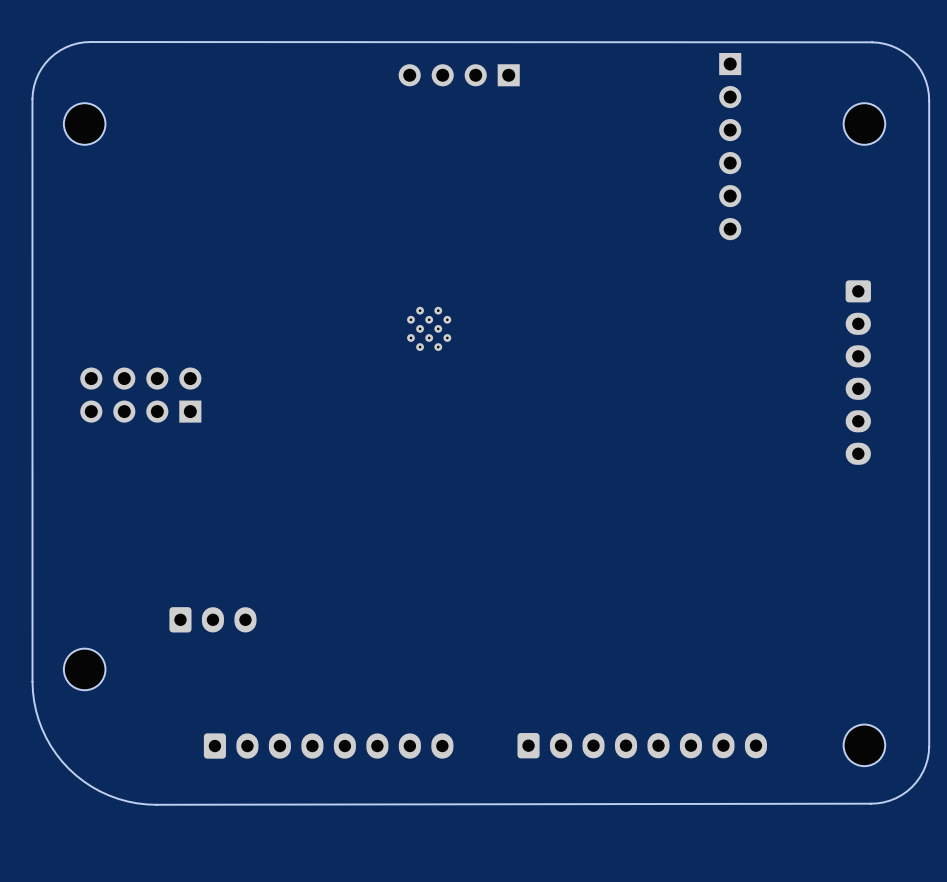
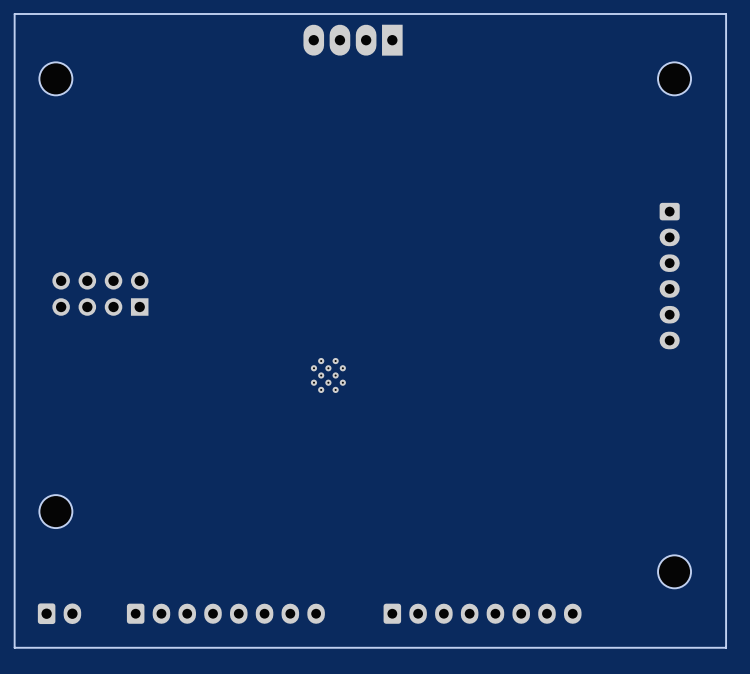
board edge: (90, 42) (872, 42) (891, 45) (908, 55) (923, 75) (929, 100) (929, 746) (925, 765) (916, 782) (895, 798) (870, 803) (156, 804) (137, 803) (109, 795) (91, 786) (76, 775) (62, 761) (46, 737) (38, 719) (32, 691) (32, 99) (38, 74) (49, 58) (71, 45) (90, 42) -> (726, 13) (726, 647) (14, 647) (14, 13) (726, 13)
part footprint: [398, 64, 520, 87] -> [303, 24, 403, 56]
part: (730, 146) -> none
part position: (429, 328) -> (328, 375)
part: (212, 619) -> none
part position: (642, 745) -> (482, 613)
part position: (328, 746) -> (225, 613)
part: none -> (59, 613)

